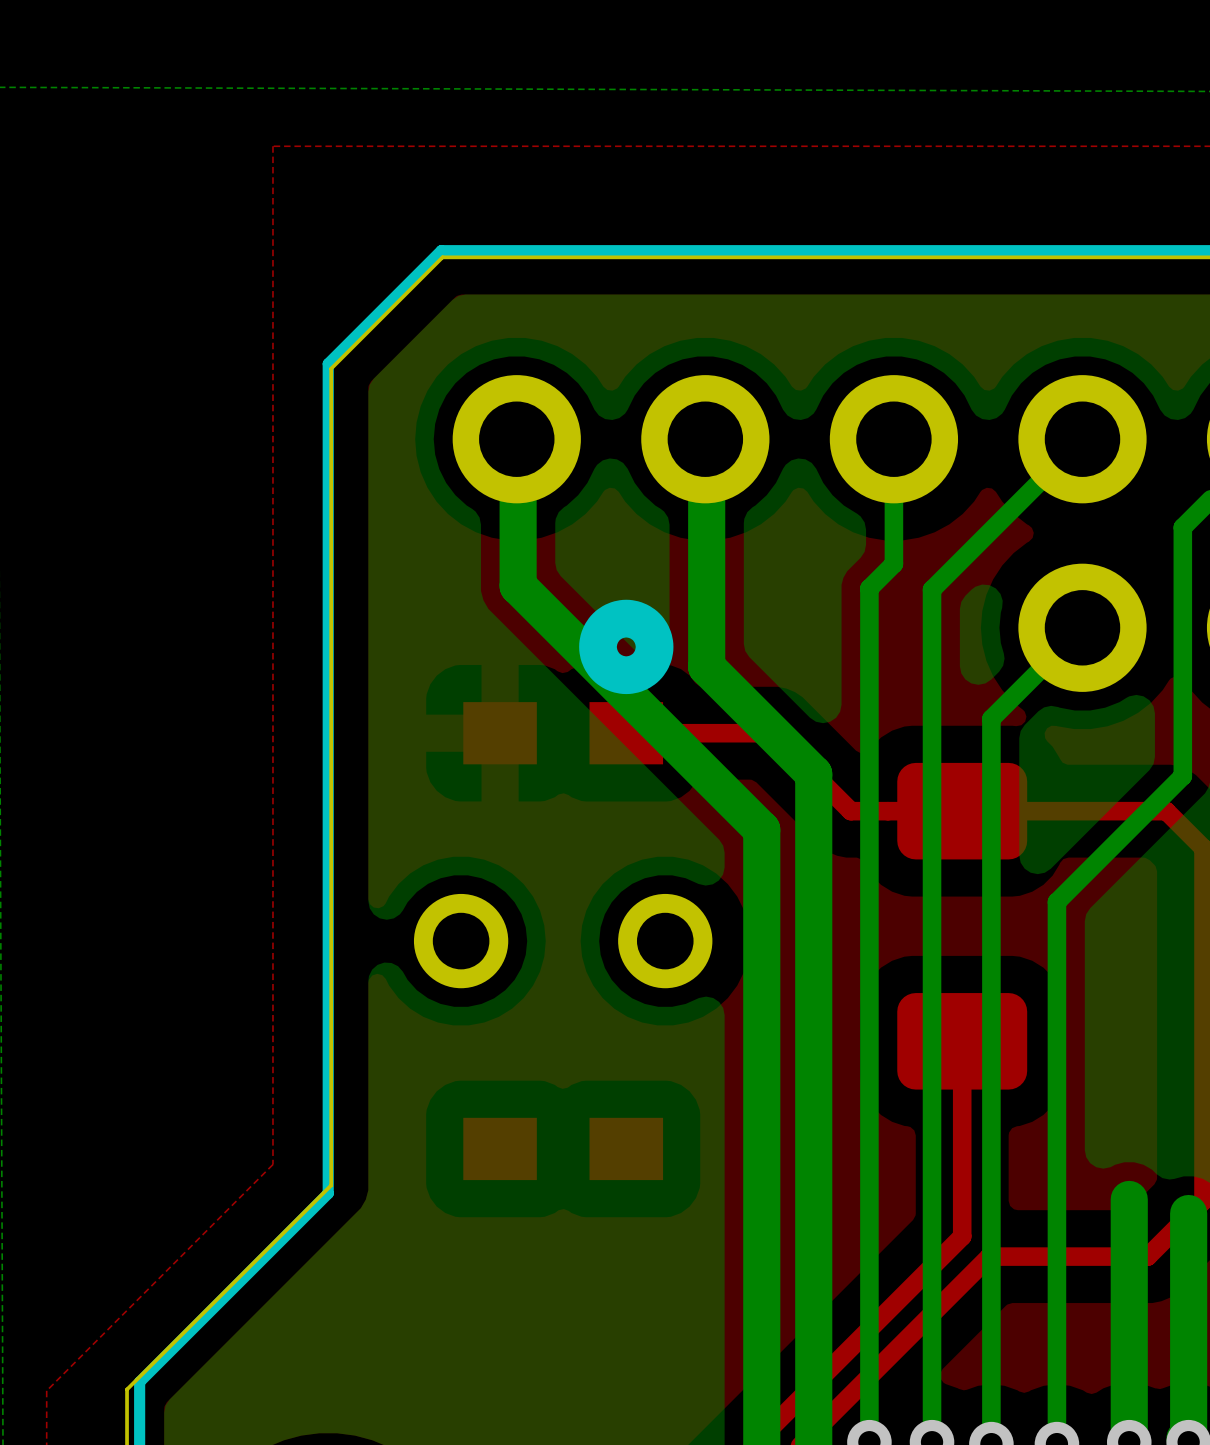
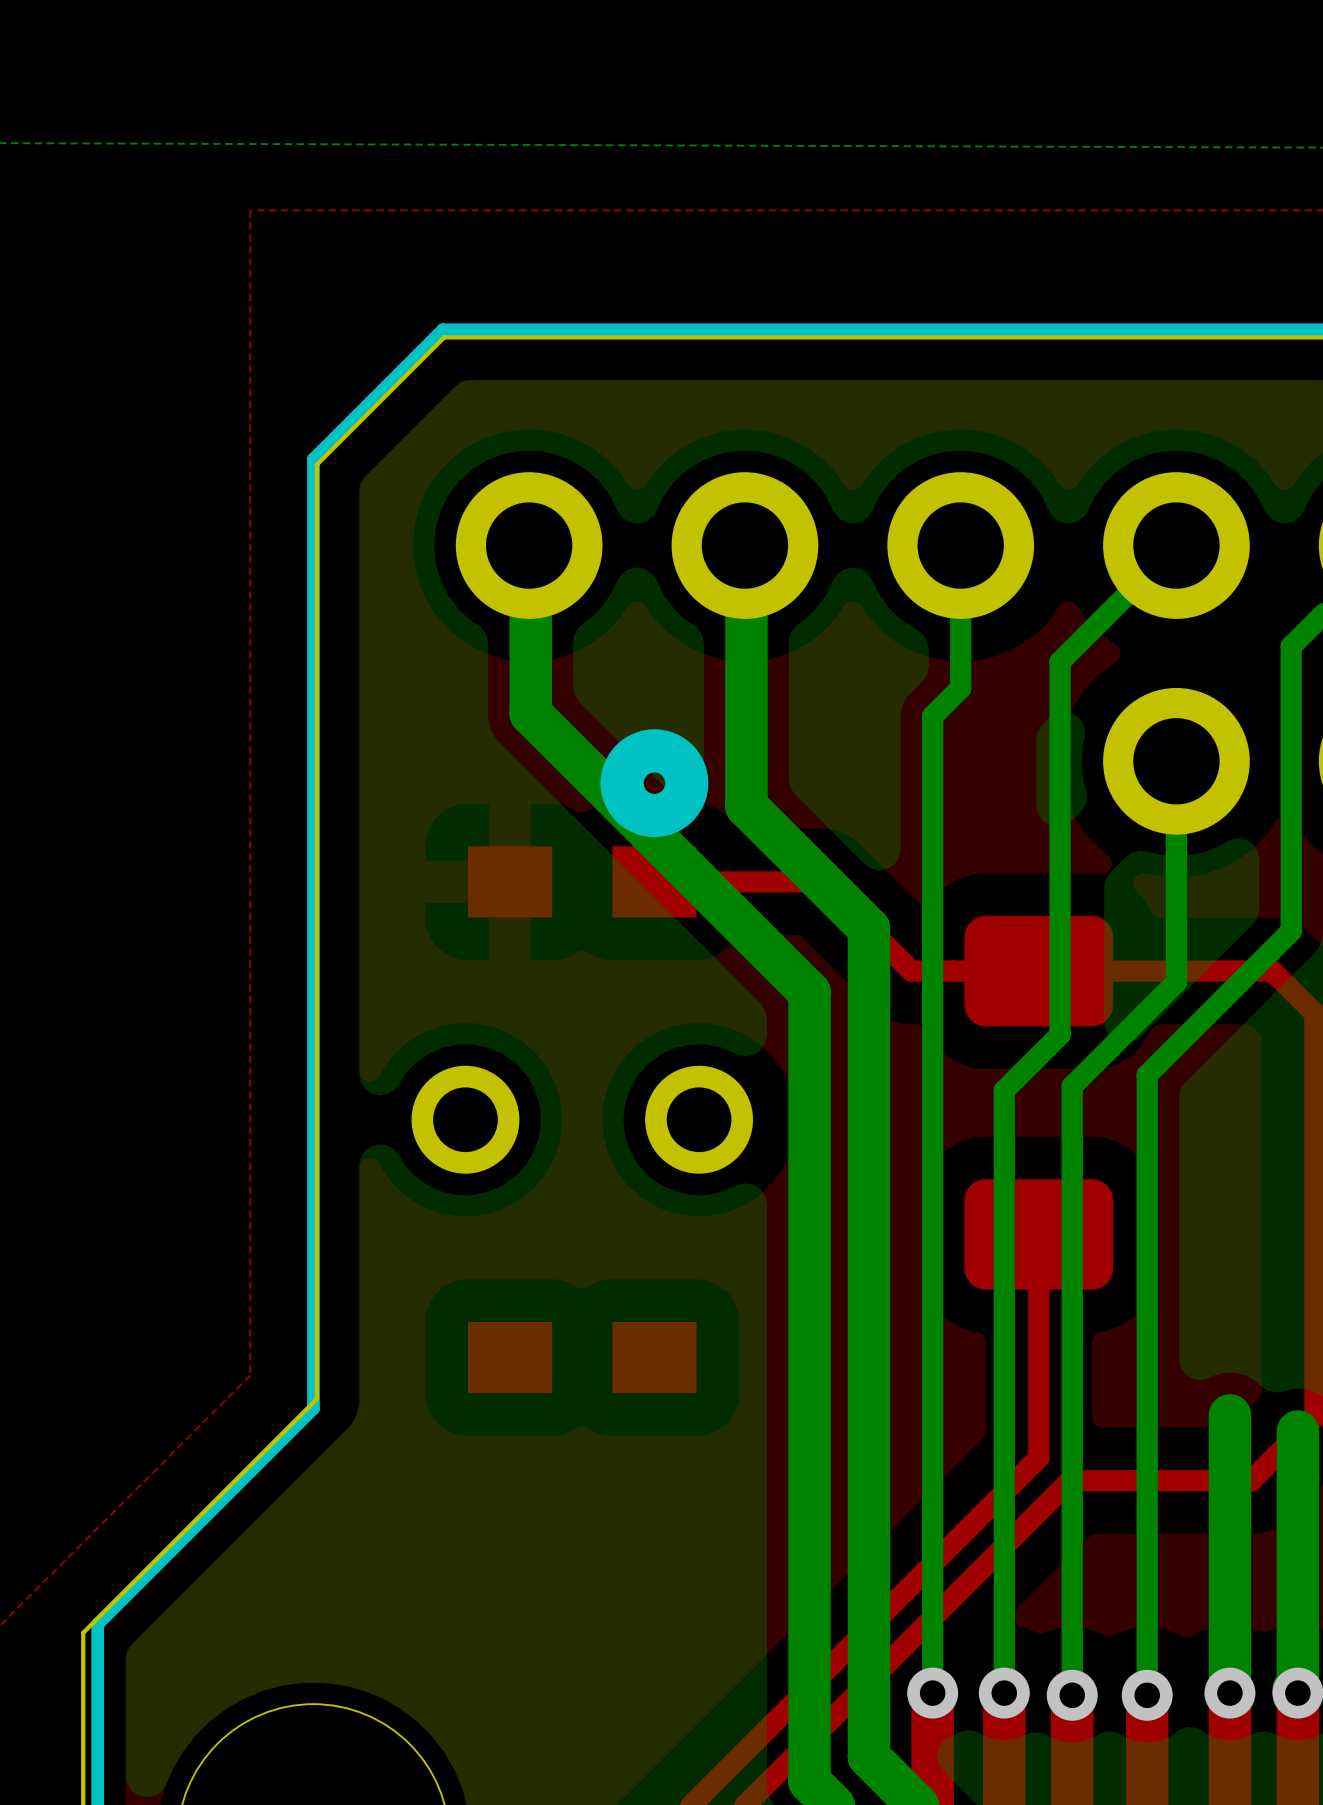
bottom track: (980, 540) (932, 589) (932, 915) -> (1060, 661) (1060, 1034) (1004, 1090)
bottom track: (1082, 627) (991, 718) (991, 911) -> (1176, 761) (1176, 982) (1072, 1086)

